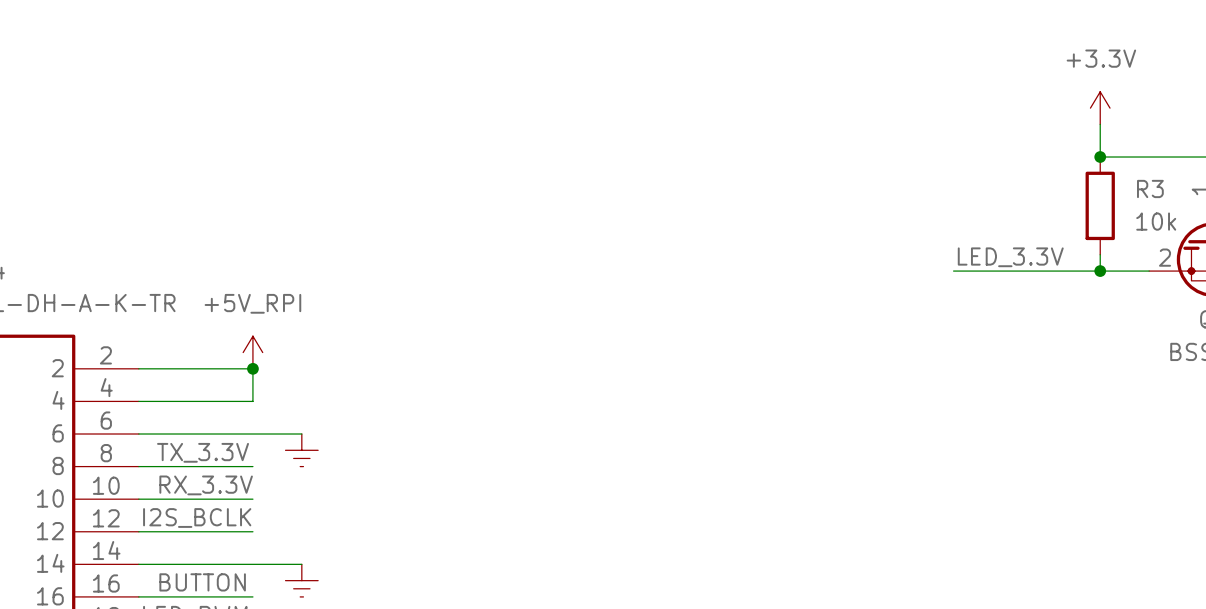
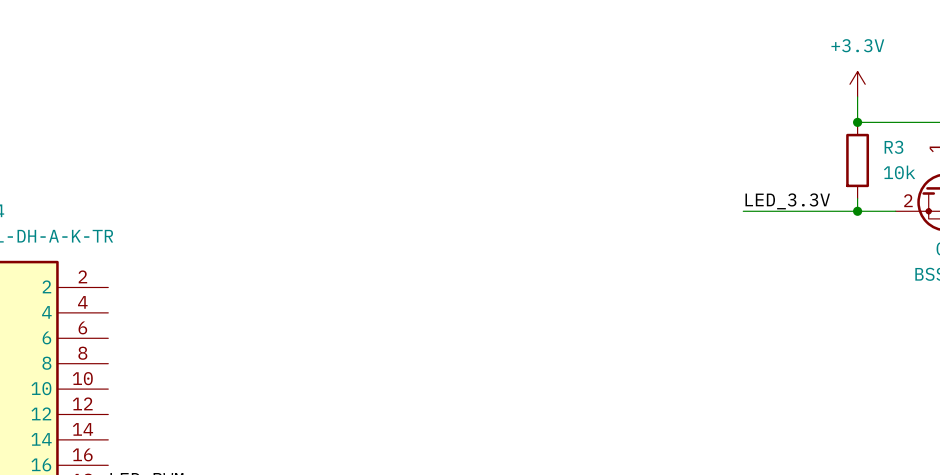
power symbol: +5V_RPI (252, 352) -> none
wire: (138, 368) (252, 368) (252, 401) (138, 401) -> none
junction: (252, 368) -> none
wire: (138, 434) (301, 434) -> none
power symbol: (301, 450) -> none
label: TX_3.3V (203, 452) -> none
wire: (138, 466) (252, 466) -> none
label: RX_3.3V (206, 485) -> none
wire: (138, 499) (252, 499) -> none
label: I2S_BCLK (197, 518) -> none
wire: (138, 531) (252, 531) -> none
wire: (138, 564) (301, 564) -> none
power symbol: (301, 580) -> none
label: BUTTON (202, 582) -> none
wire: (138, 596) (252, 596) -> none

